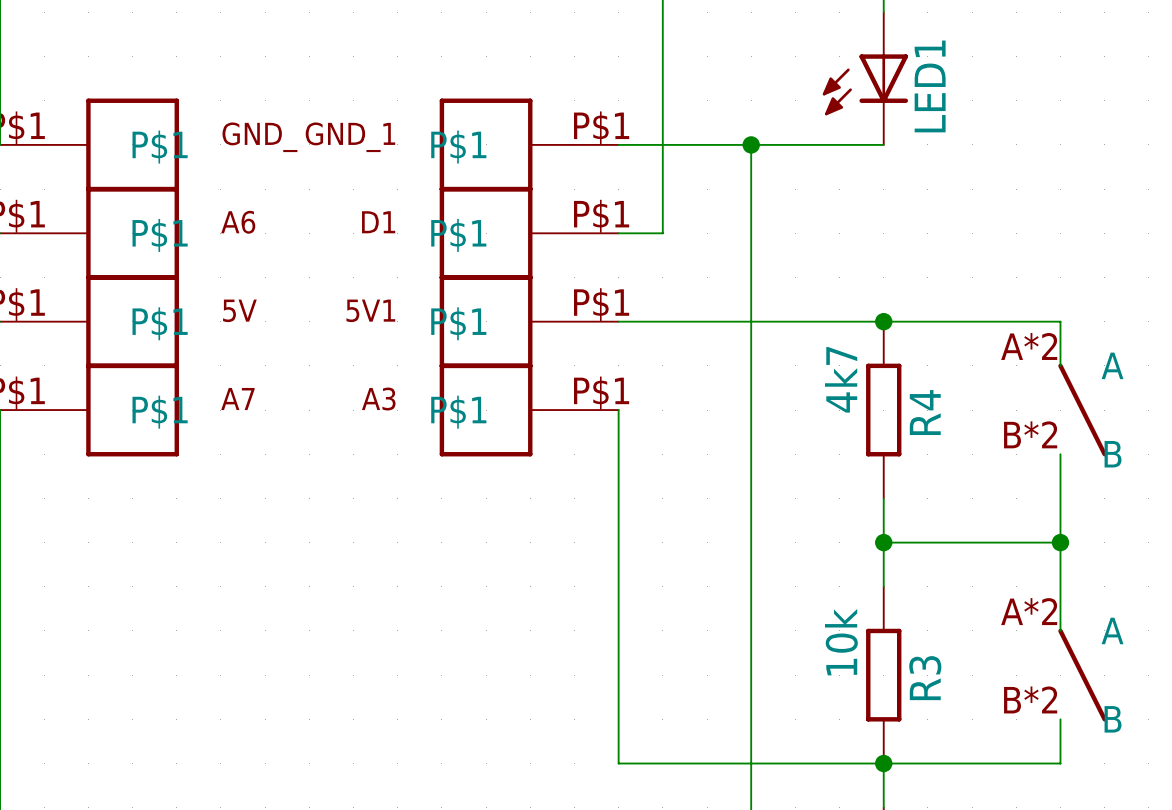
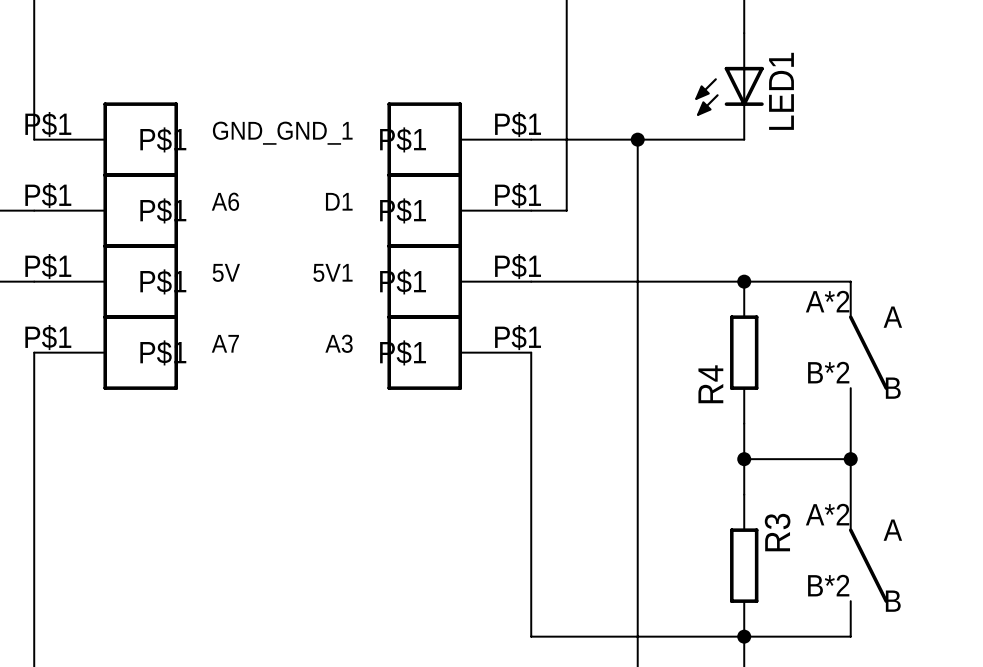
wire: (1016, 321) (1060, 321) (1060, 365) -> (850, 281) (850, 317)
R4 value: 4k7 (841, 379) -> none
part position: (1082, 410) -> (868, 352)
R4 name position: R4 (925, 412) -> R4 (710, 384)
wire: (1060, 454) (1060, 630) -> (850, 388) (850, 530)
wire: (1016, 542) (1060, 542) -> none
junction position: (1060, 542) -> (850, 459)
R3 value: 10k (841, 642) -> none
part position: (1082, 675) -> (868, 565)
R3 name position: R3 (925, 678) -> R3 (777, 532)
wire: (1060, 719) (1060, 763) (1016, 763) -> (850, 601) (850, 636)

